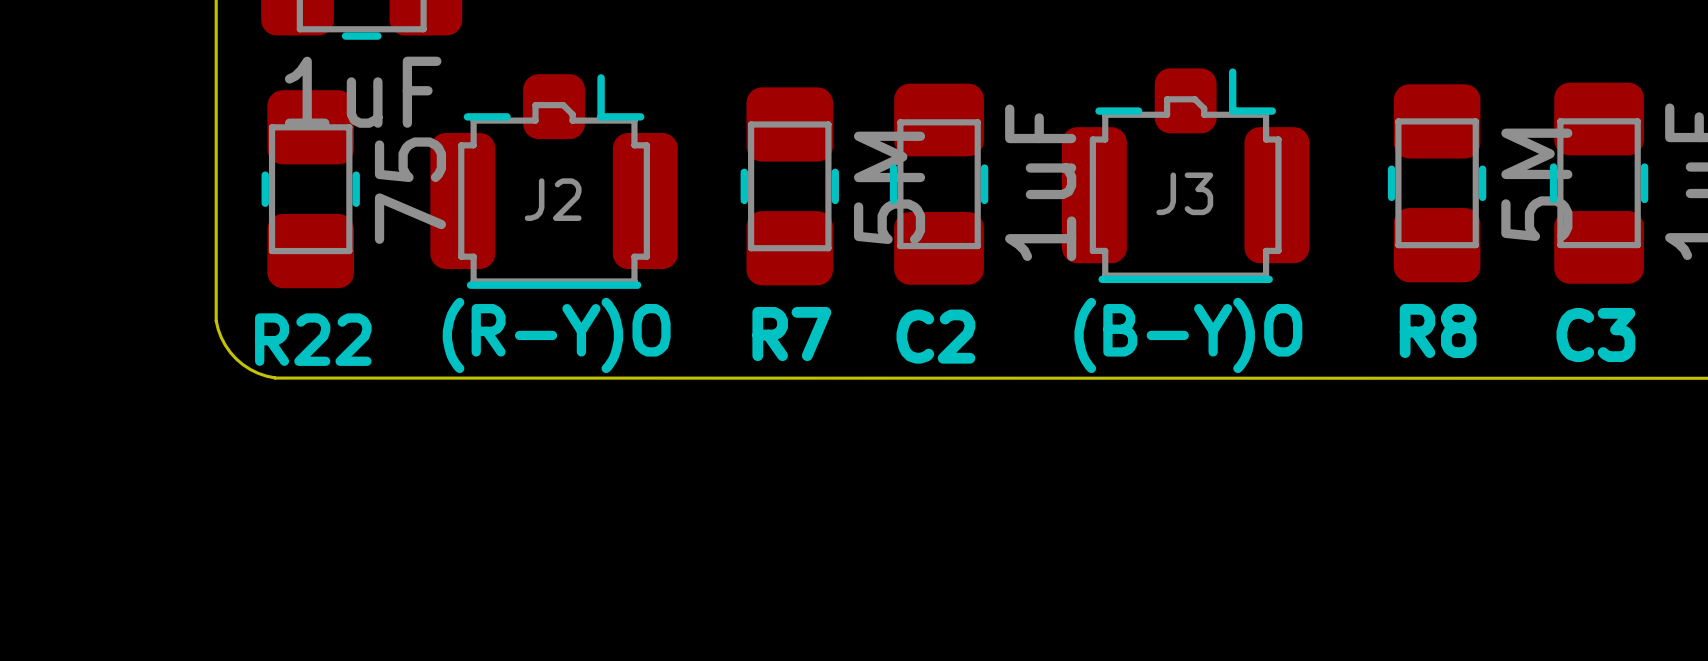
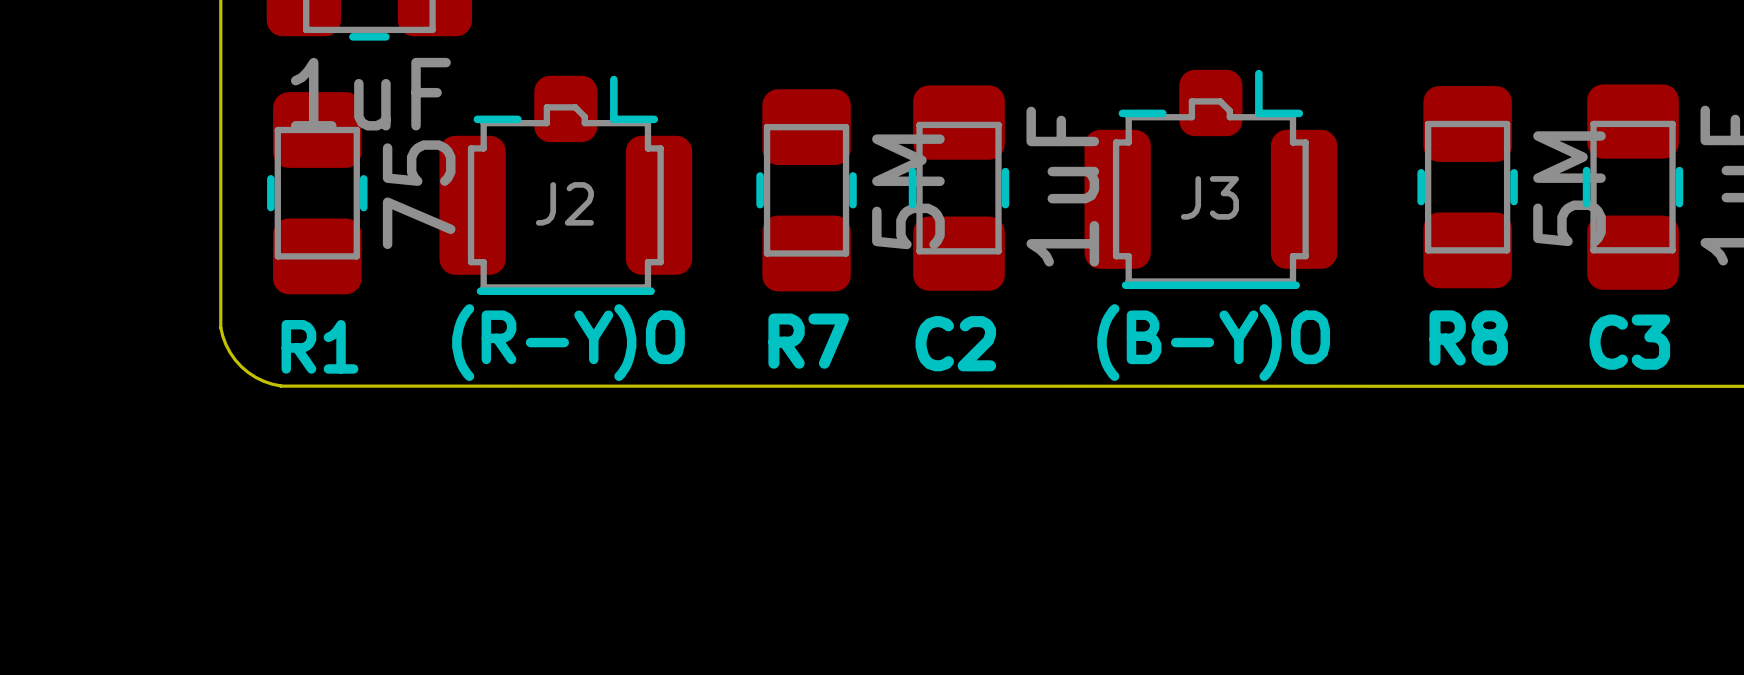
R22 name: R22 (313, 339) -> R1 (319, 346)

